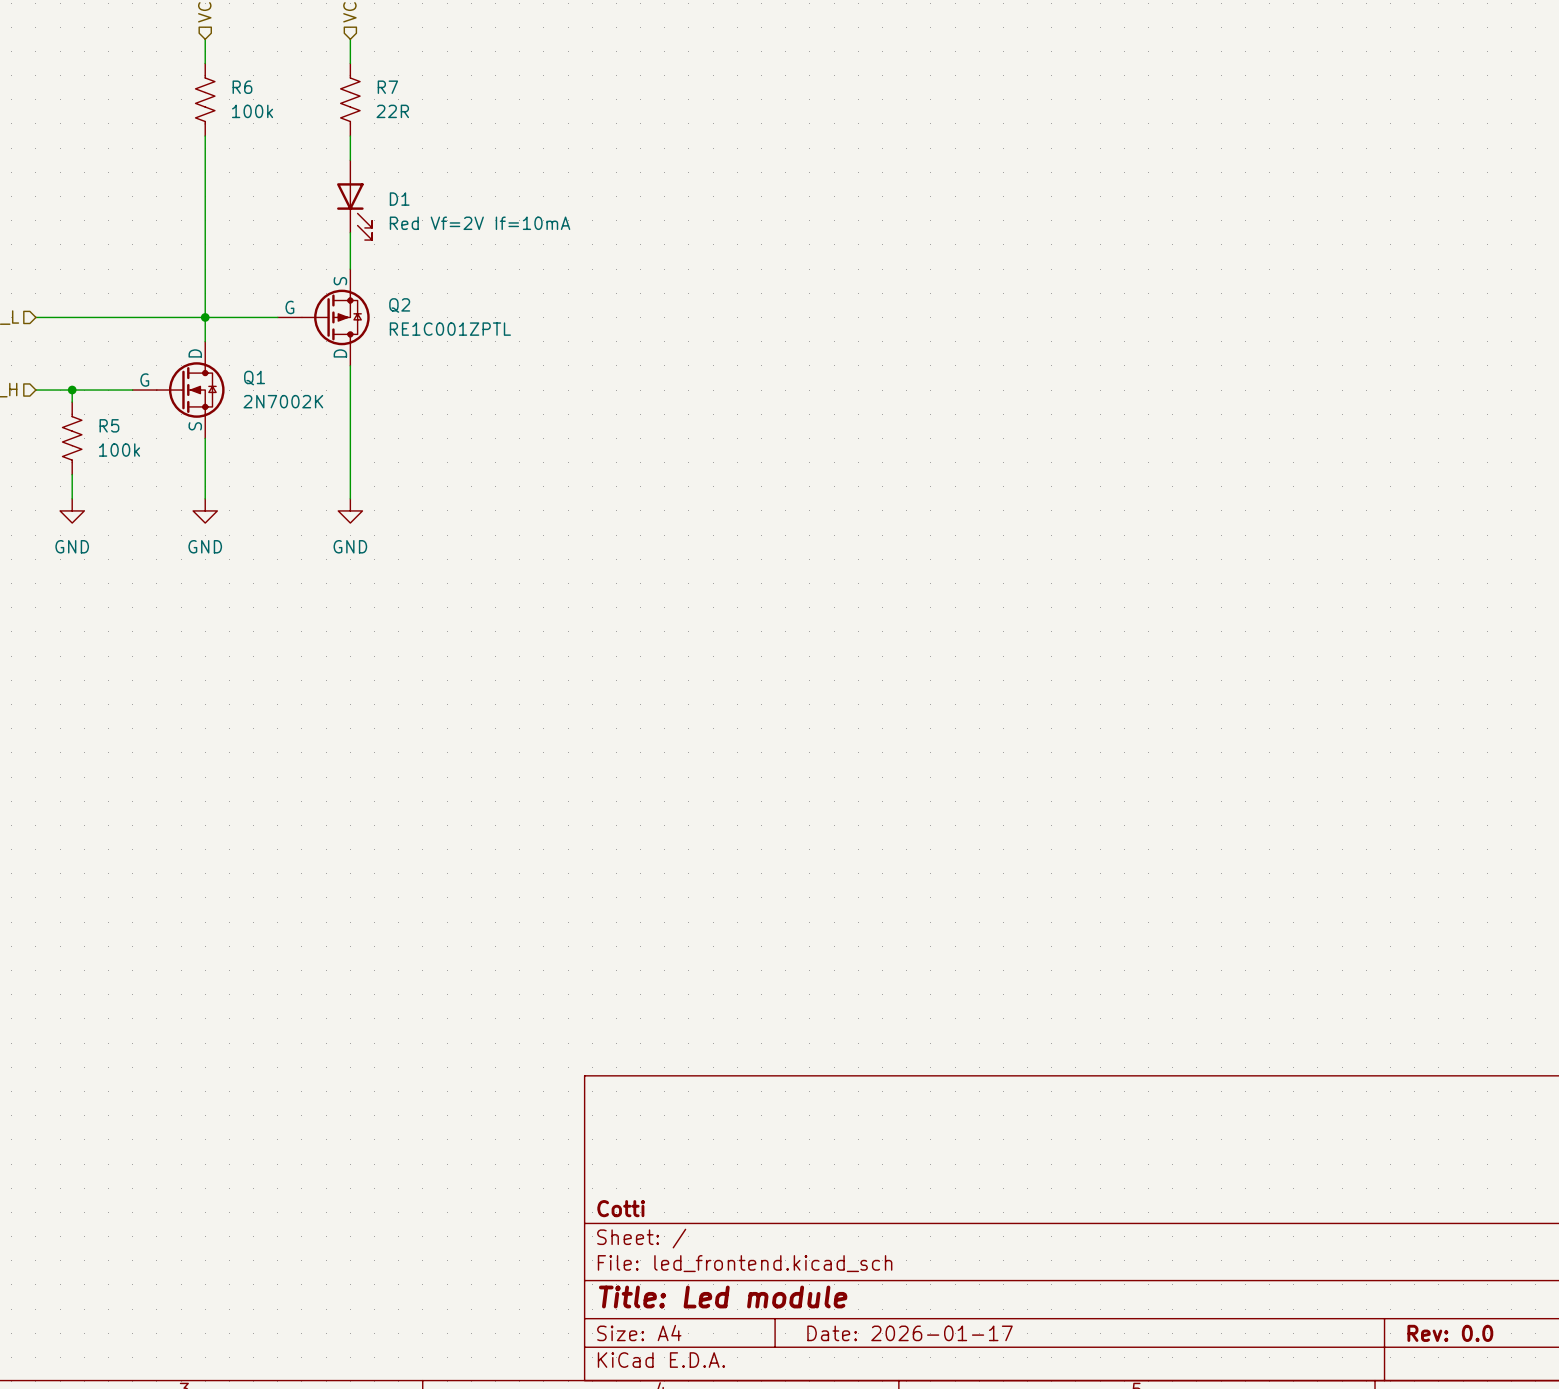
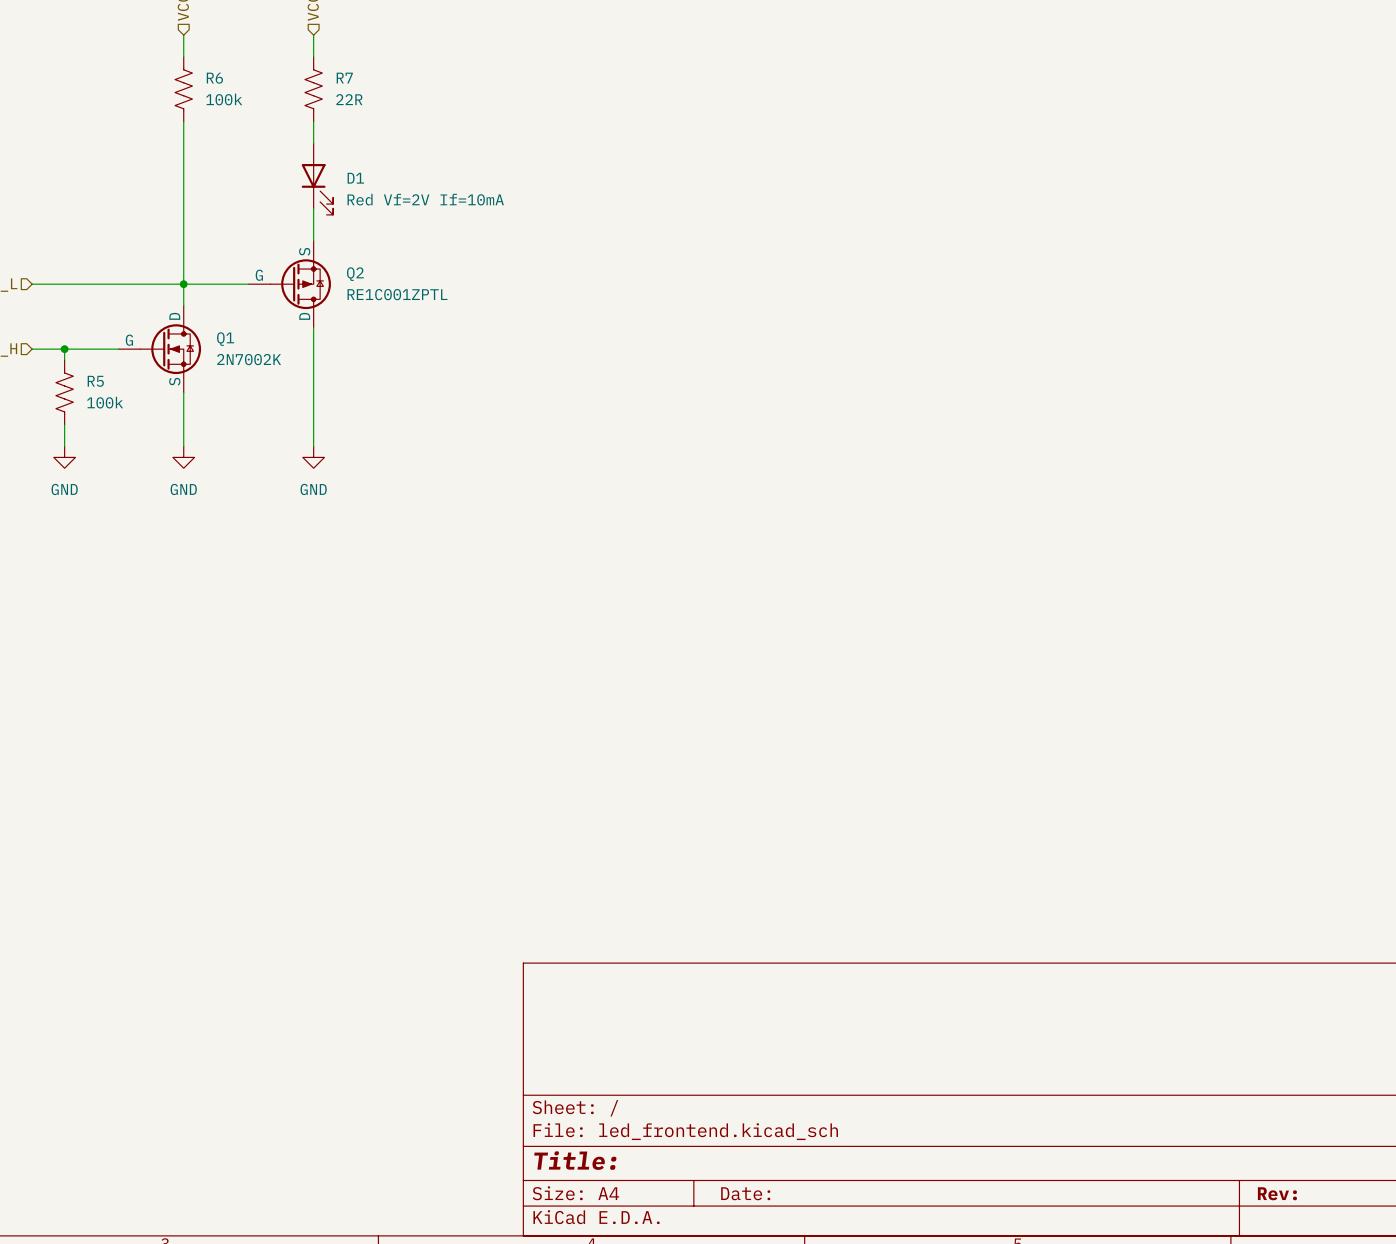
title block: Cotti (621, 1208) -> none
title block: Title: Led module (723, 1297) -> Title: (575, 1160)
title block: Date: 2026-01-17 (910, 1333) -> Date: (745, 1193)
title block: Rev: 0.0 (1450, 1333) -> Rev: (1277, 1193)

